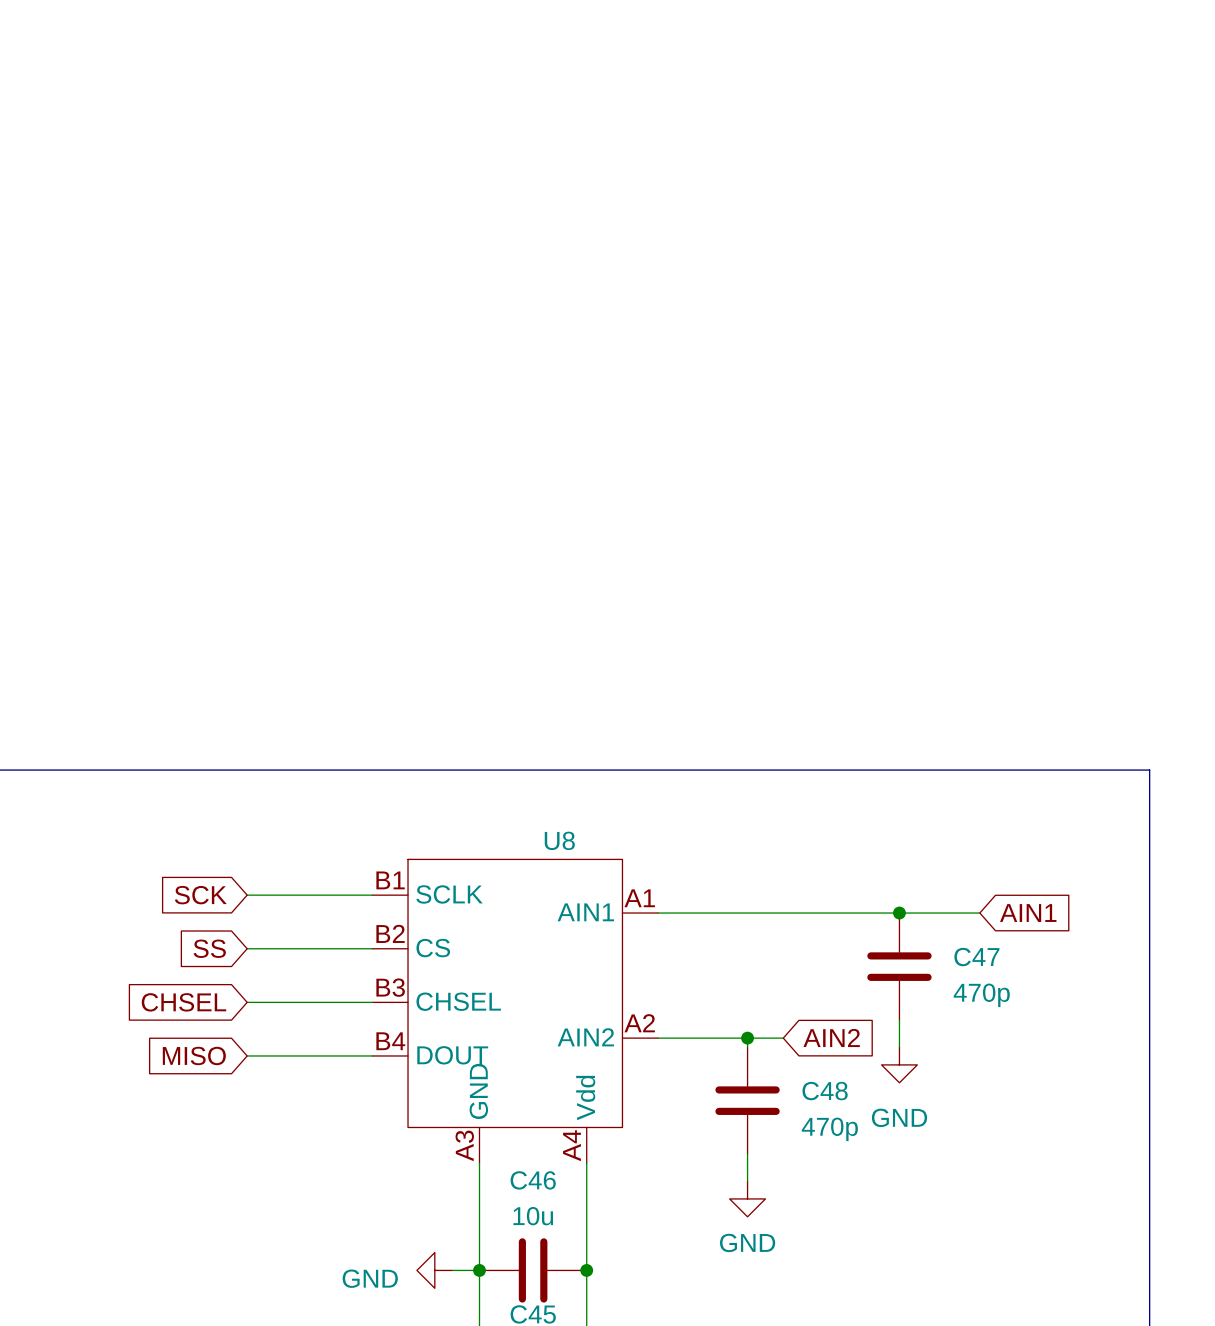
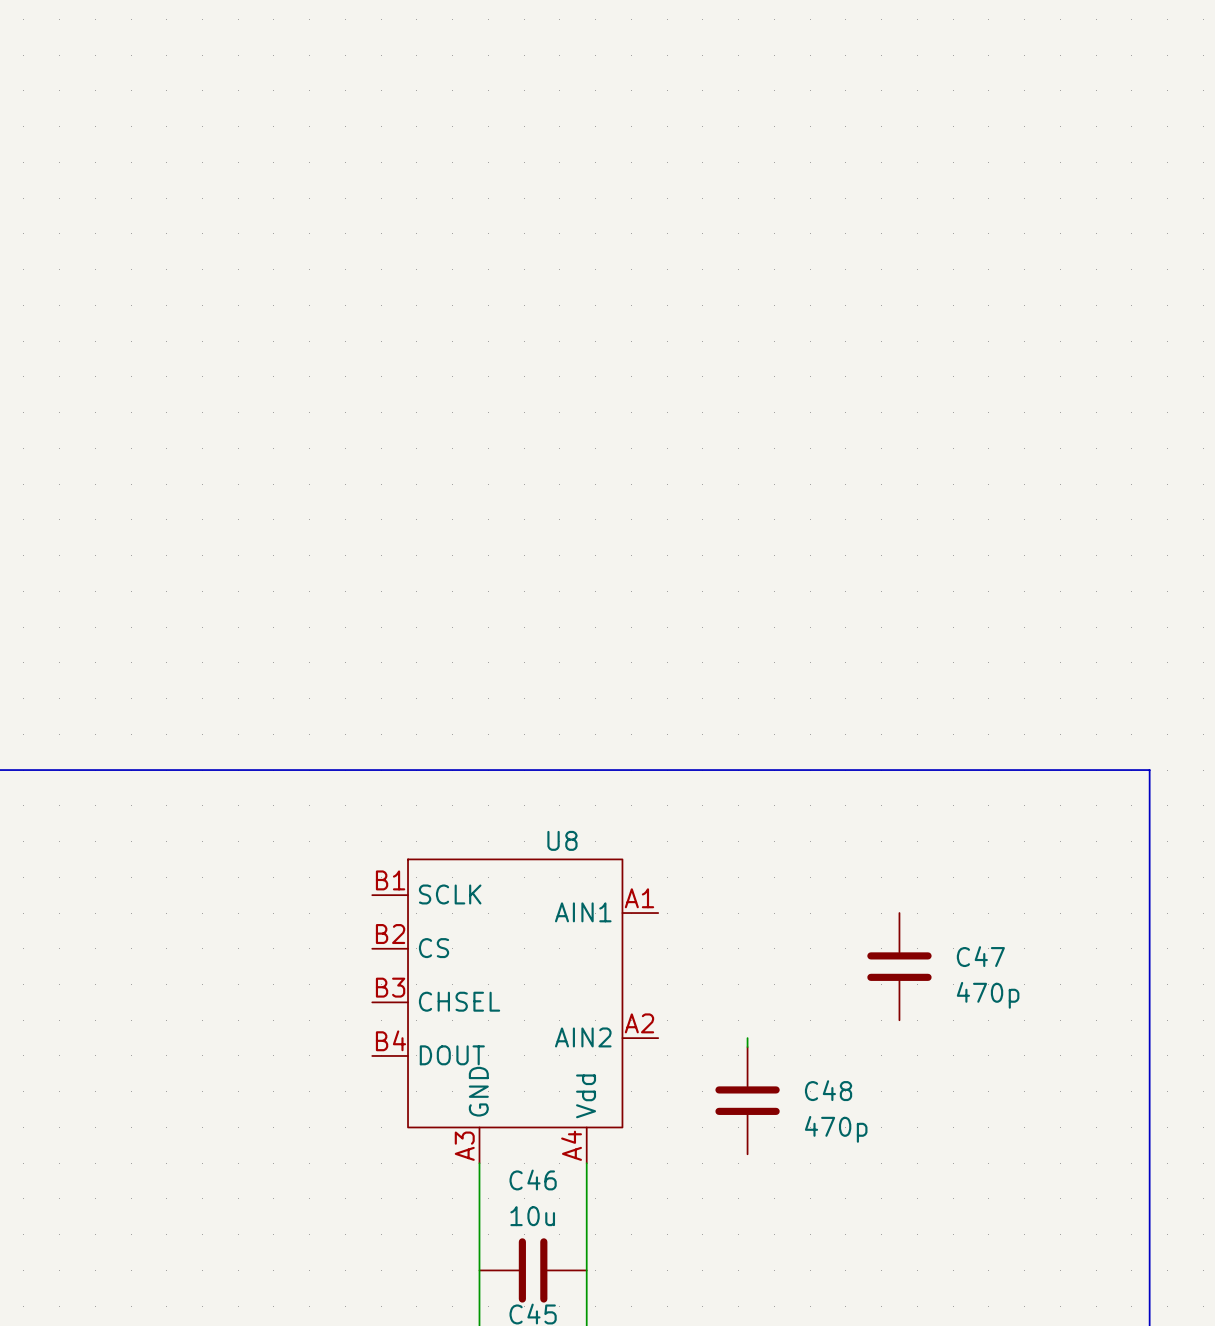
global label: SCK (200, 895) -> none
wire: (247, 895) (372, 895) -> none
wire: (658, 913) (979, 913) -> none
junction: (899, 913) -> none
global label: AIN1 (1028, 913) -> none
global label: SS (209, 948) -> none
wire: (247, 948) (372, 948) -> none
global label: CHSEL (183, 1002) -> none
wire: (247, 1002) (372, 1002) -> none
wire: (899, 1020) (899, 1047) -> none
global label: AIN2 (831, 1037) -> none
wire: (658, 1038) (783, 1038) -> none
junction: (747, 1038) -> none
global label: MISO (194, 1055) -> none
wire: (247, 1055) (372, 1055) -> none
power symbol: GND (899, 1064) -> none
wire: (747, 1154) (747, 1181) -> none
power symbol: GND (747, 1198) -> none
power symbol: GND (434, 1270) -> none
wire: (452, 1270) (479, 1270) -> none
junction: (479, 1270) -> none
junction: (586, 1270) -> none

